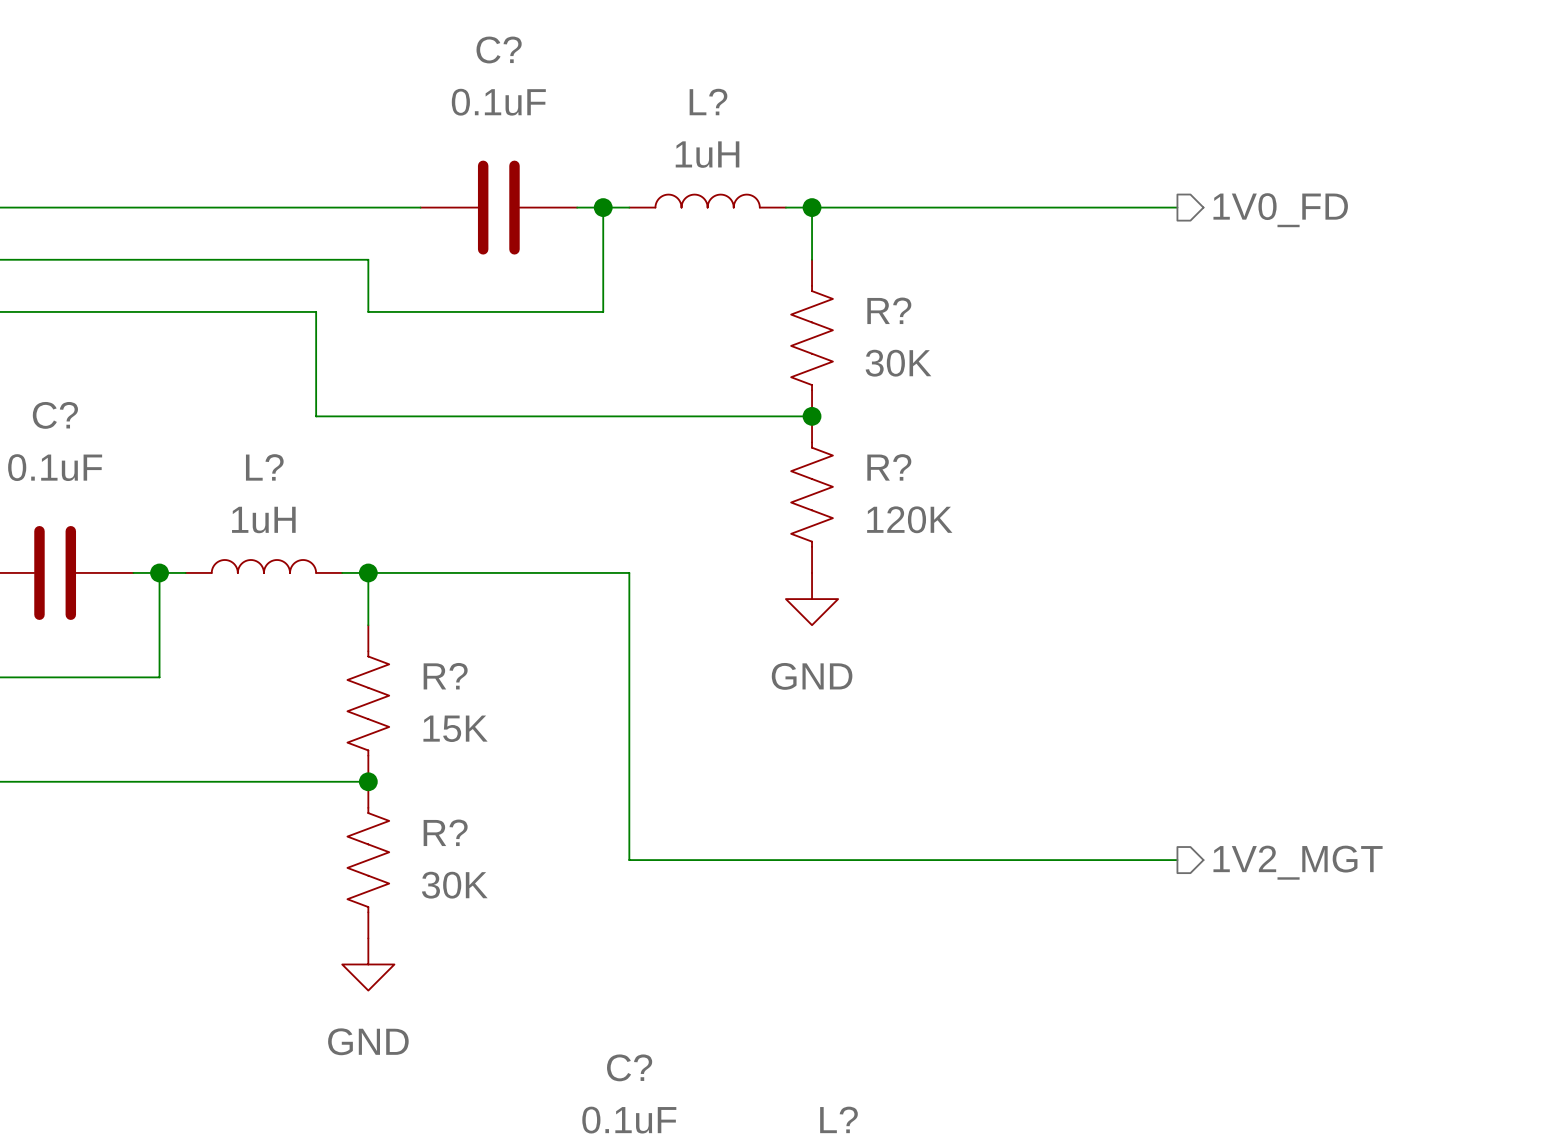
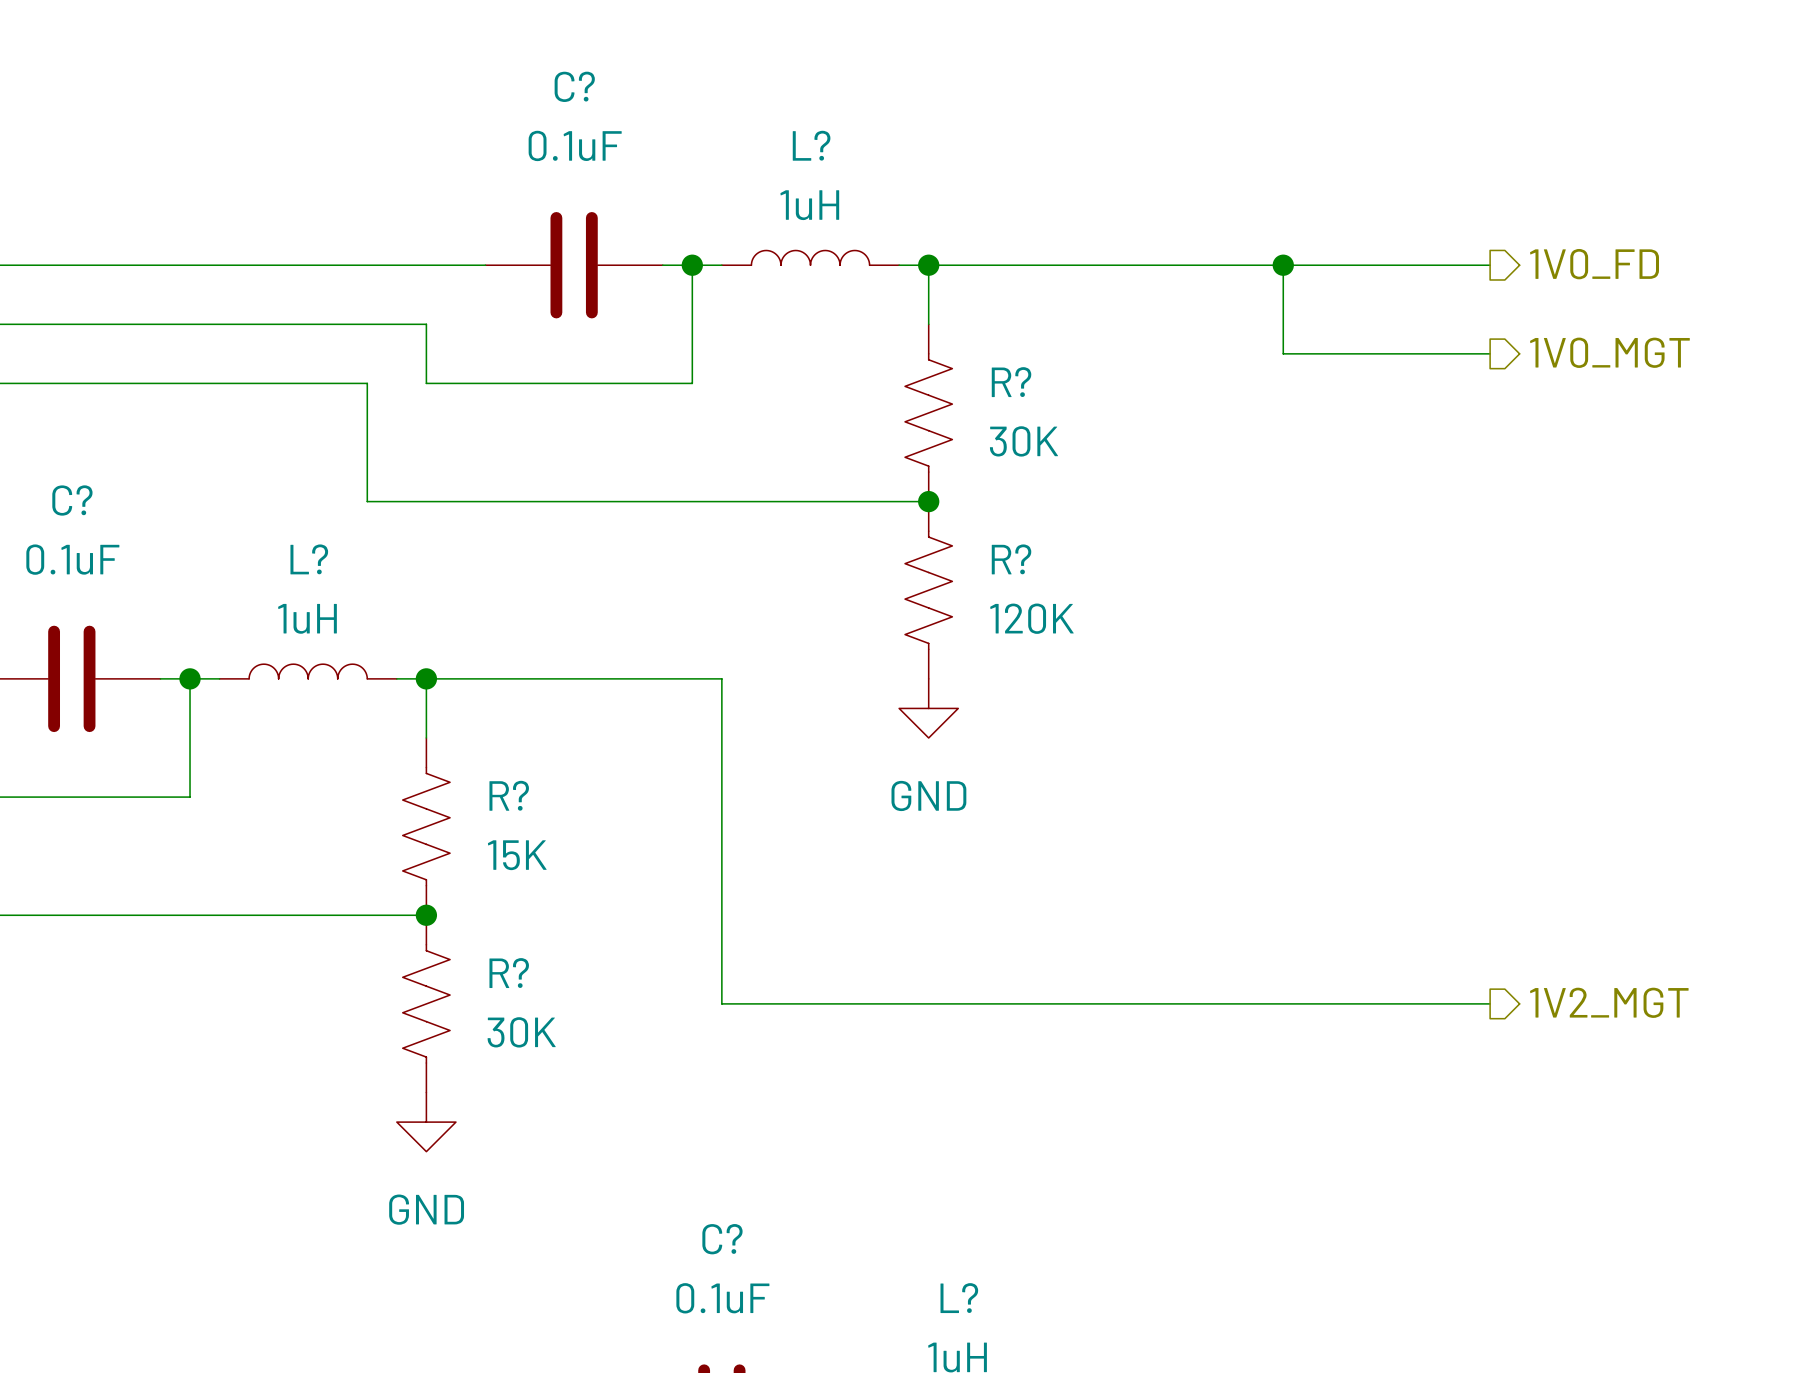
wire: none -> (1283, 265) (1283, 353) (1490, 353)
junction: none -> (1283, 265)
wire: none -> (1342, 265) (1490, 265)
hierarchical label position: 1V0_FD (1280, 210) -> 1V0_FD (1594, 264)
hierarchical label: none -> 1V0_MGT (1609, 352)
wire: none -> (1342, 1003) (1490, 1003)
hierarchical label position: 1V2_MGT (1298, 862) -> 1V2_MGT (1609, 1002)

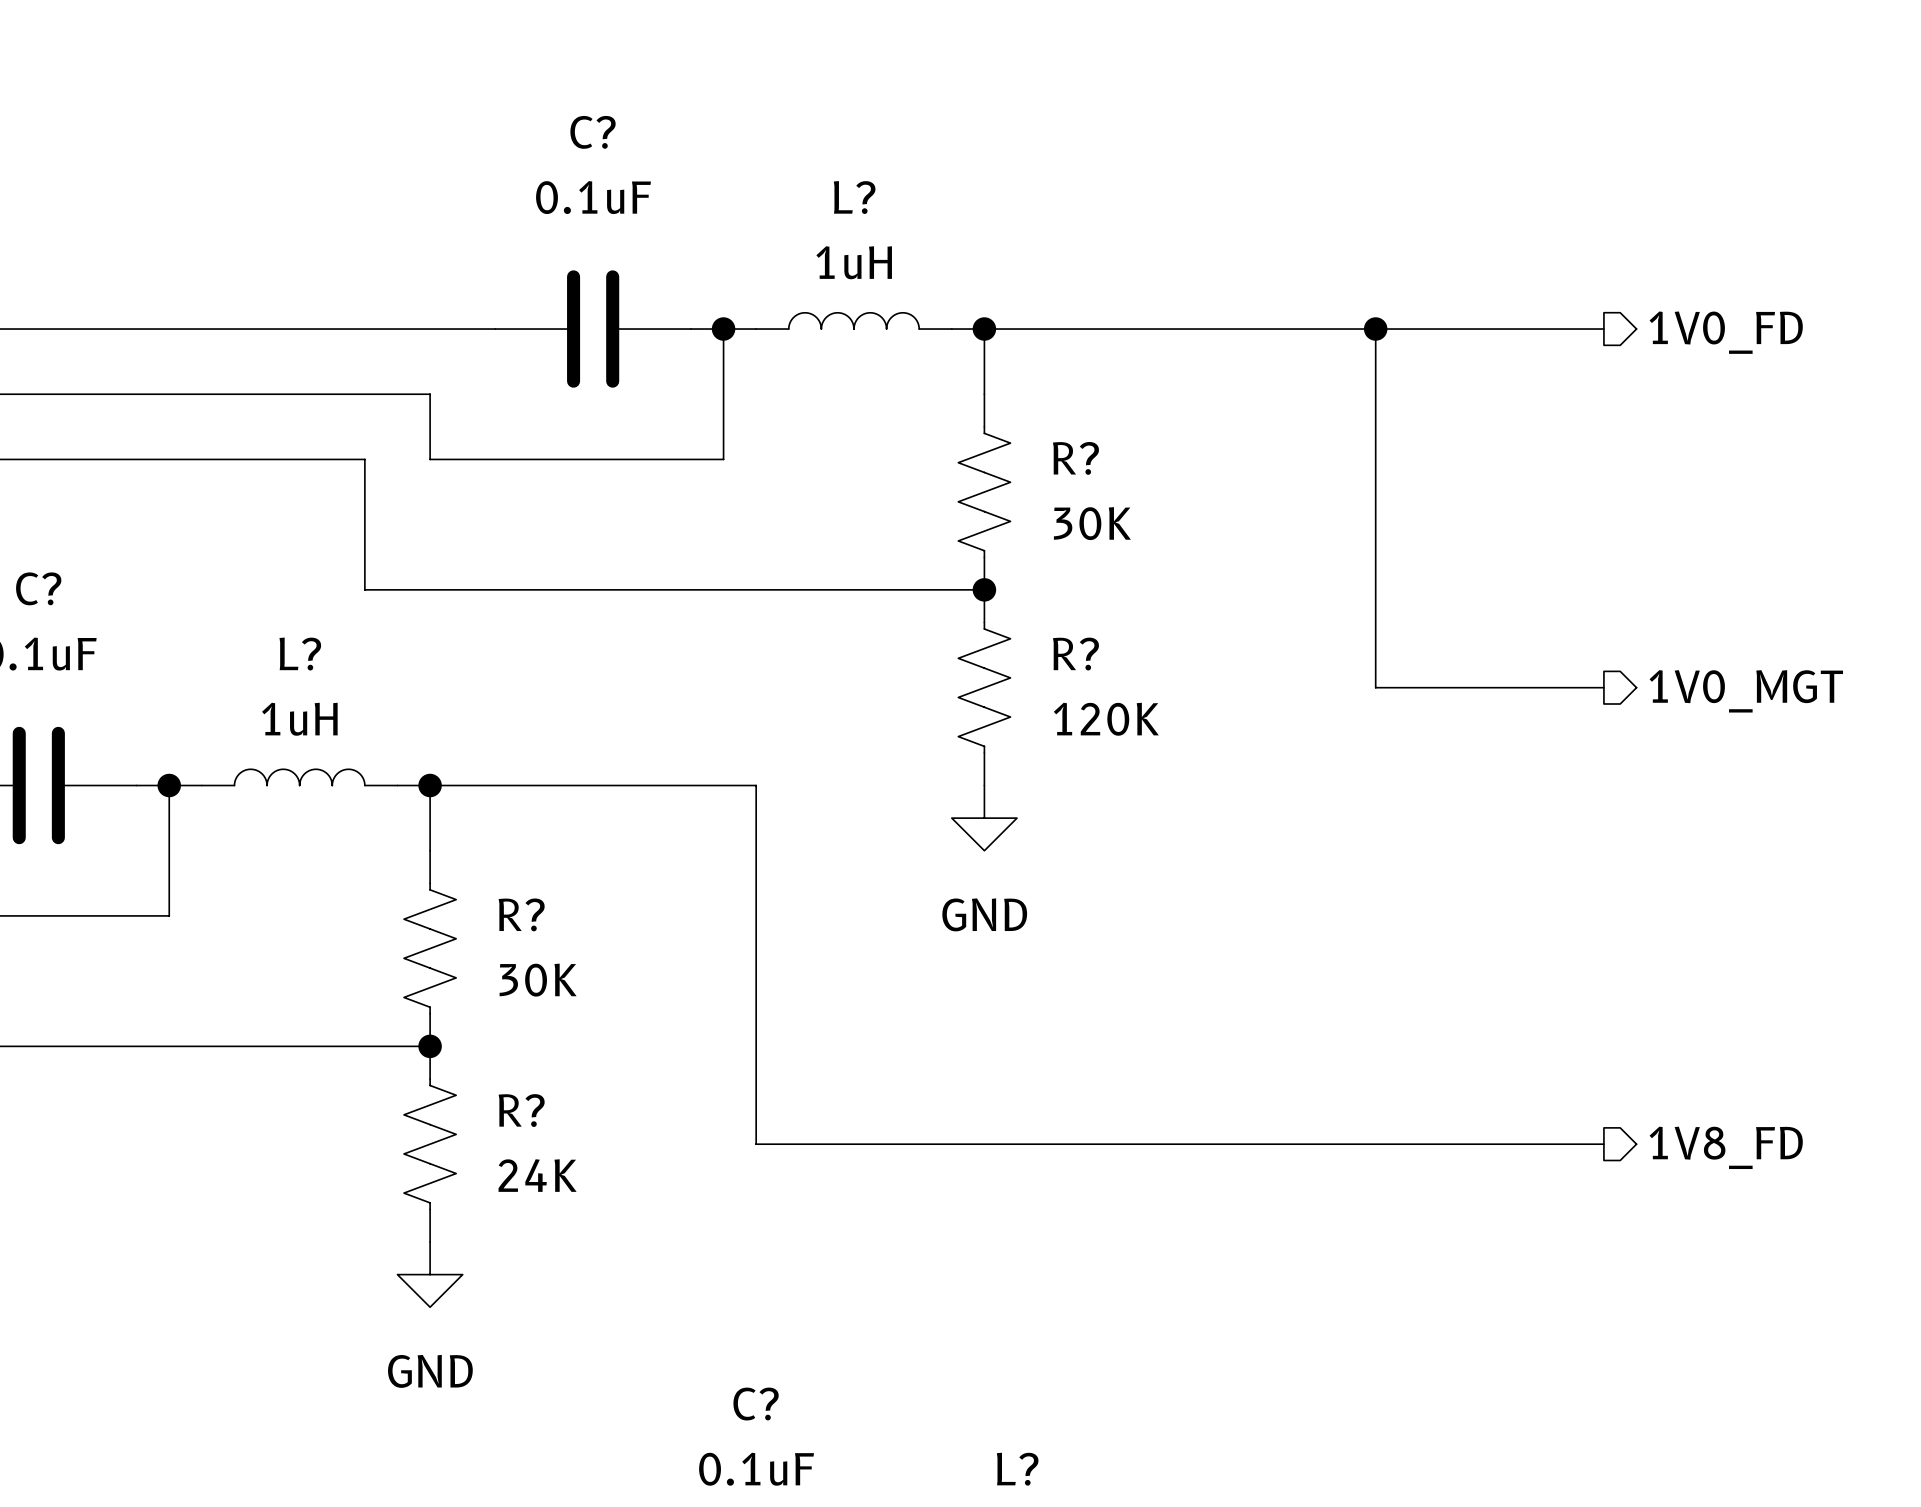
hierarchical label position: 1V0_MGT (1609, 352) -> 1V0_MGT (1746, 691)
wire: (1283, 353) (1490, 353) -> (1375, 426) (1375, 687) (1603, 687)
R? value: 15K (517, 855) -> 30K (538, 980)
hierarchical label: 1V2_MGT (1609, 1002) -> 1V8_FD (1726, 1147)
R? value: 30K (521, 1032) -> 24K (537, 1175)

